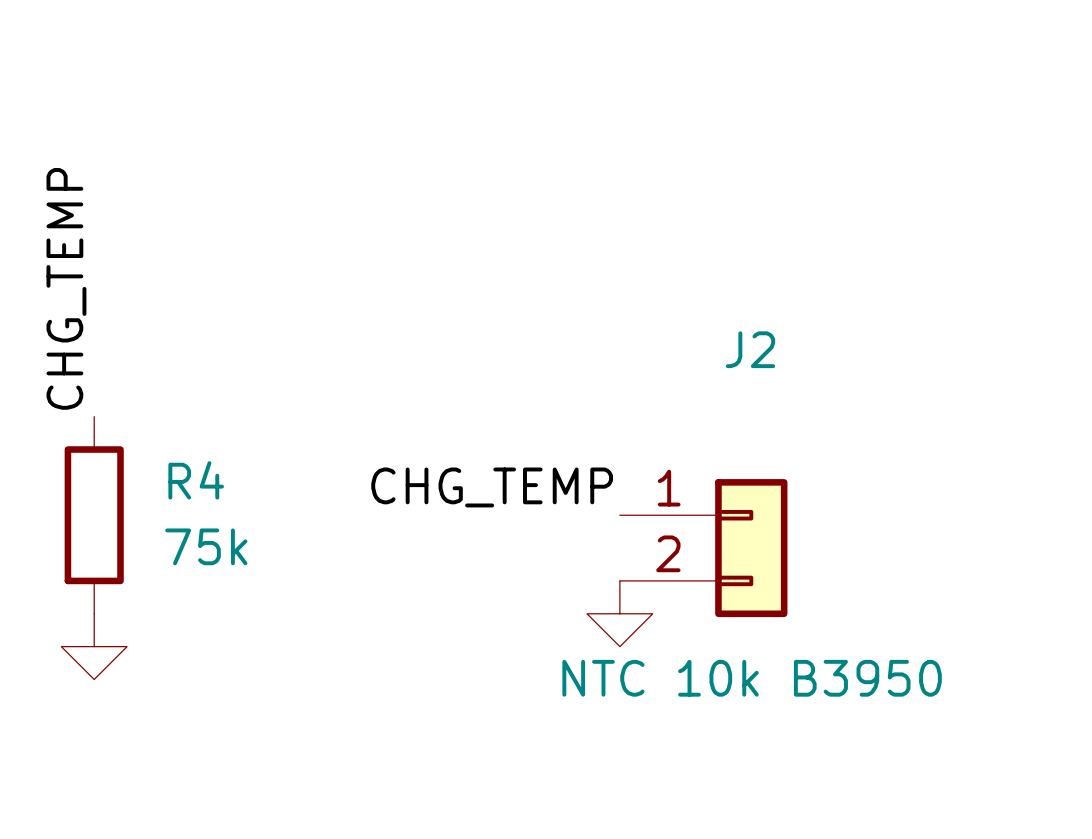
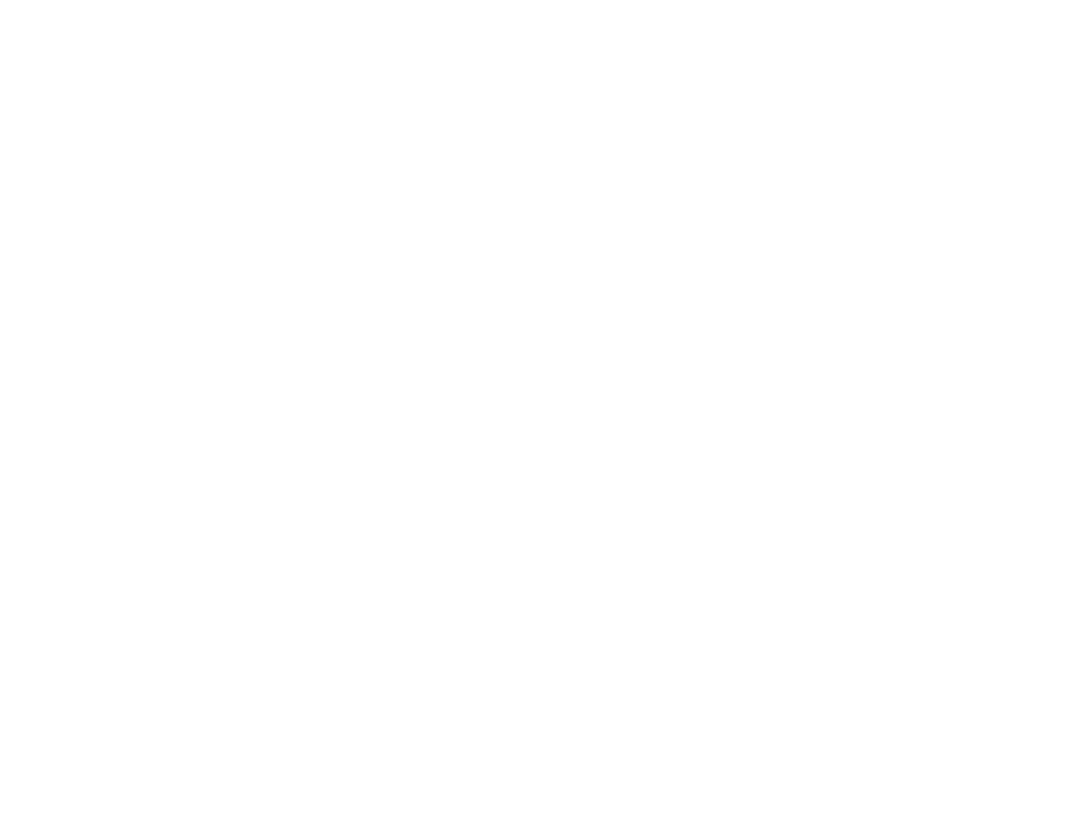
label: CHG_TEMP (66, 288) -> none
label: CHG_TEMP (492, 487) -> none
R4: 75k (94, 515) -> none
J2: NTC 10k B3950 (703, 548) -> none
power symbol: (619, 613) -> none
power symbol: (94, 646) -> none

